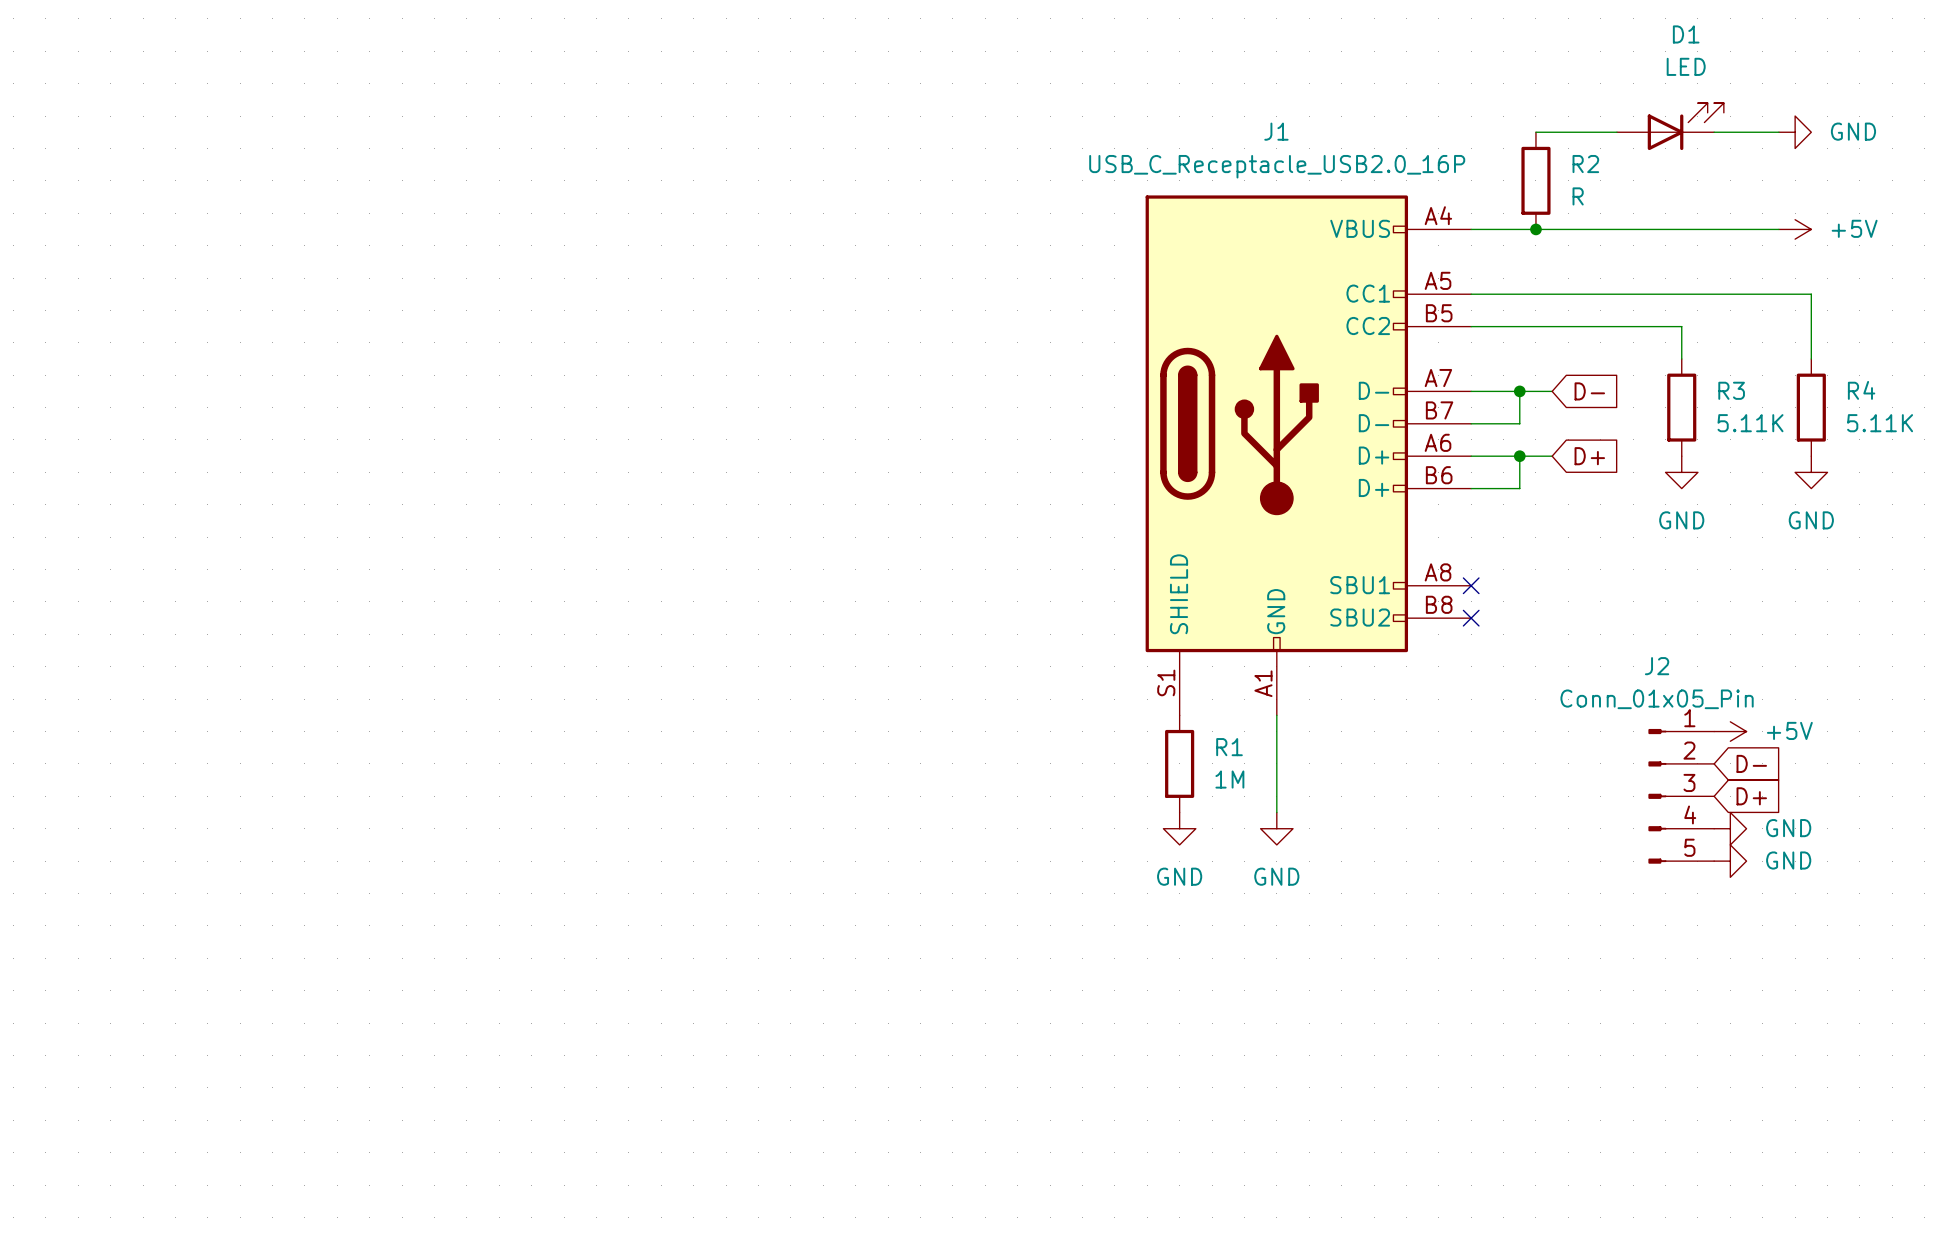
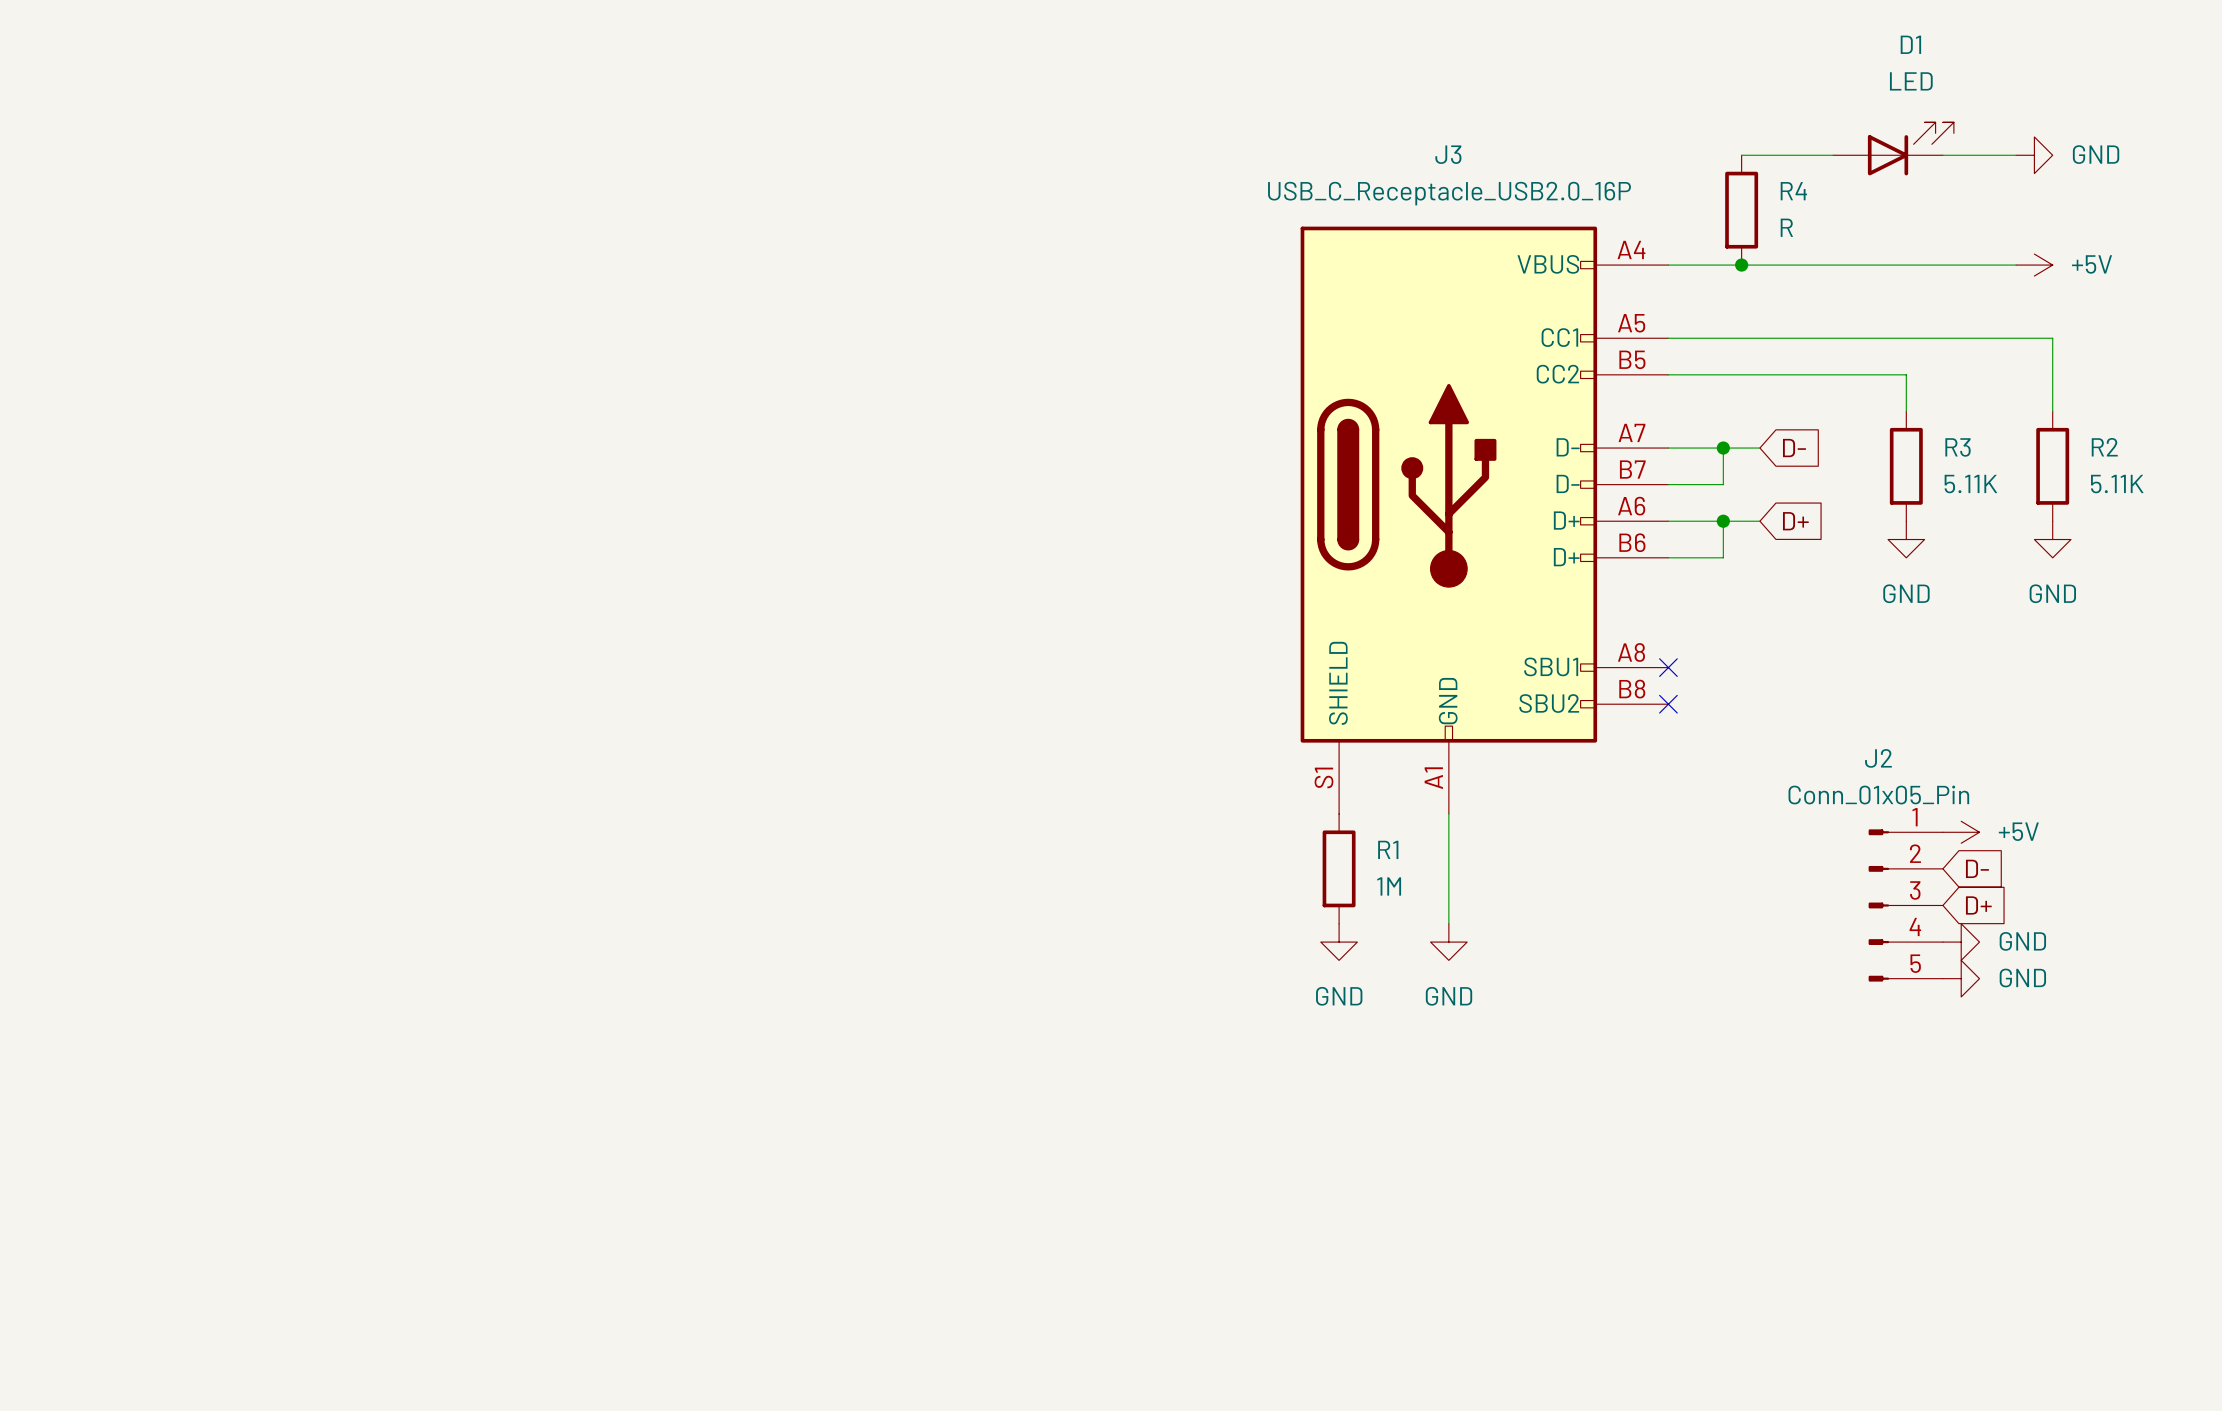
J1 name: J1 (1276, 131) -> J3 (1448, 154)
R2 name: R2 (1585, 164) -> R4 (1793, 191)
R4 name: R4 (1861, 390) -> R2 (2104, 447)

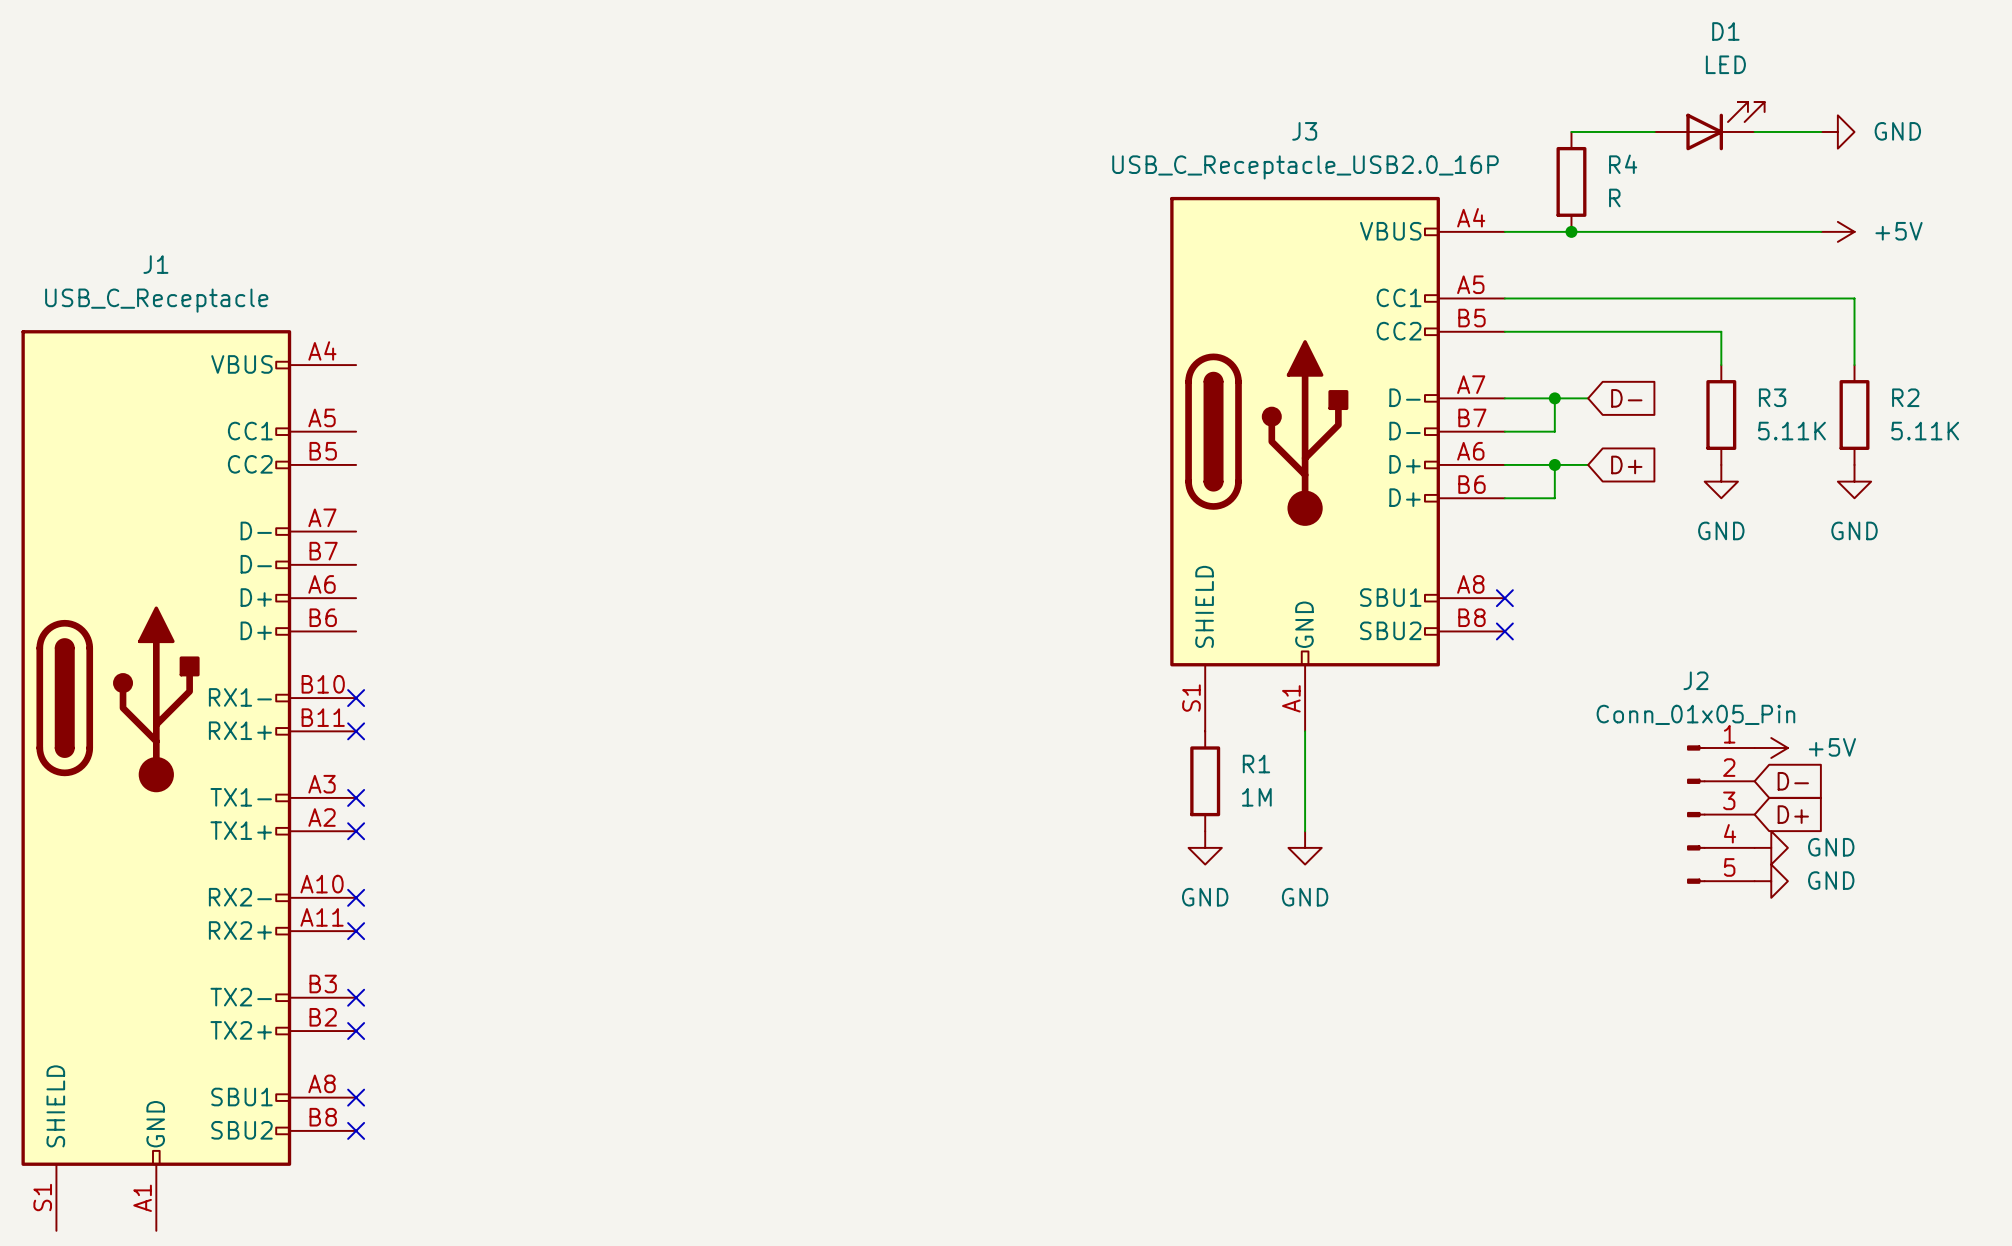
no-connect mark: none -> (356, 698)
no-connect mark: none -> (356, 731)
J1: none -> USB_C_Receptacle (188, 780)
no-connect mark: none -> (356, 797)
no-connect mark: none -> (356, 831)
no-connect mark: none -> (356, 897)
no-connect mark: none -> (356, 931)
no-connect mark: none -> (356, 997)
no-connect mark: none -> (356, 1031)
no-connect mark: none -> (356, 1097)
no-connect mark: none -> (356, 1130)

